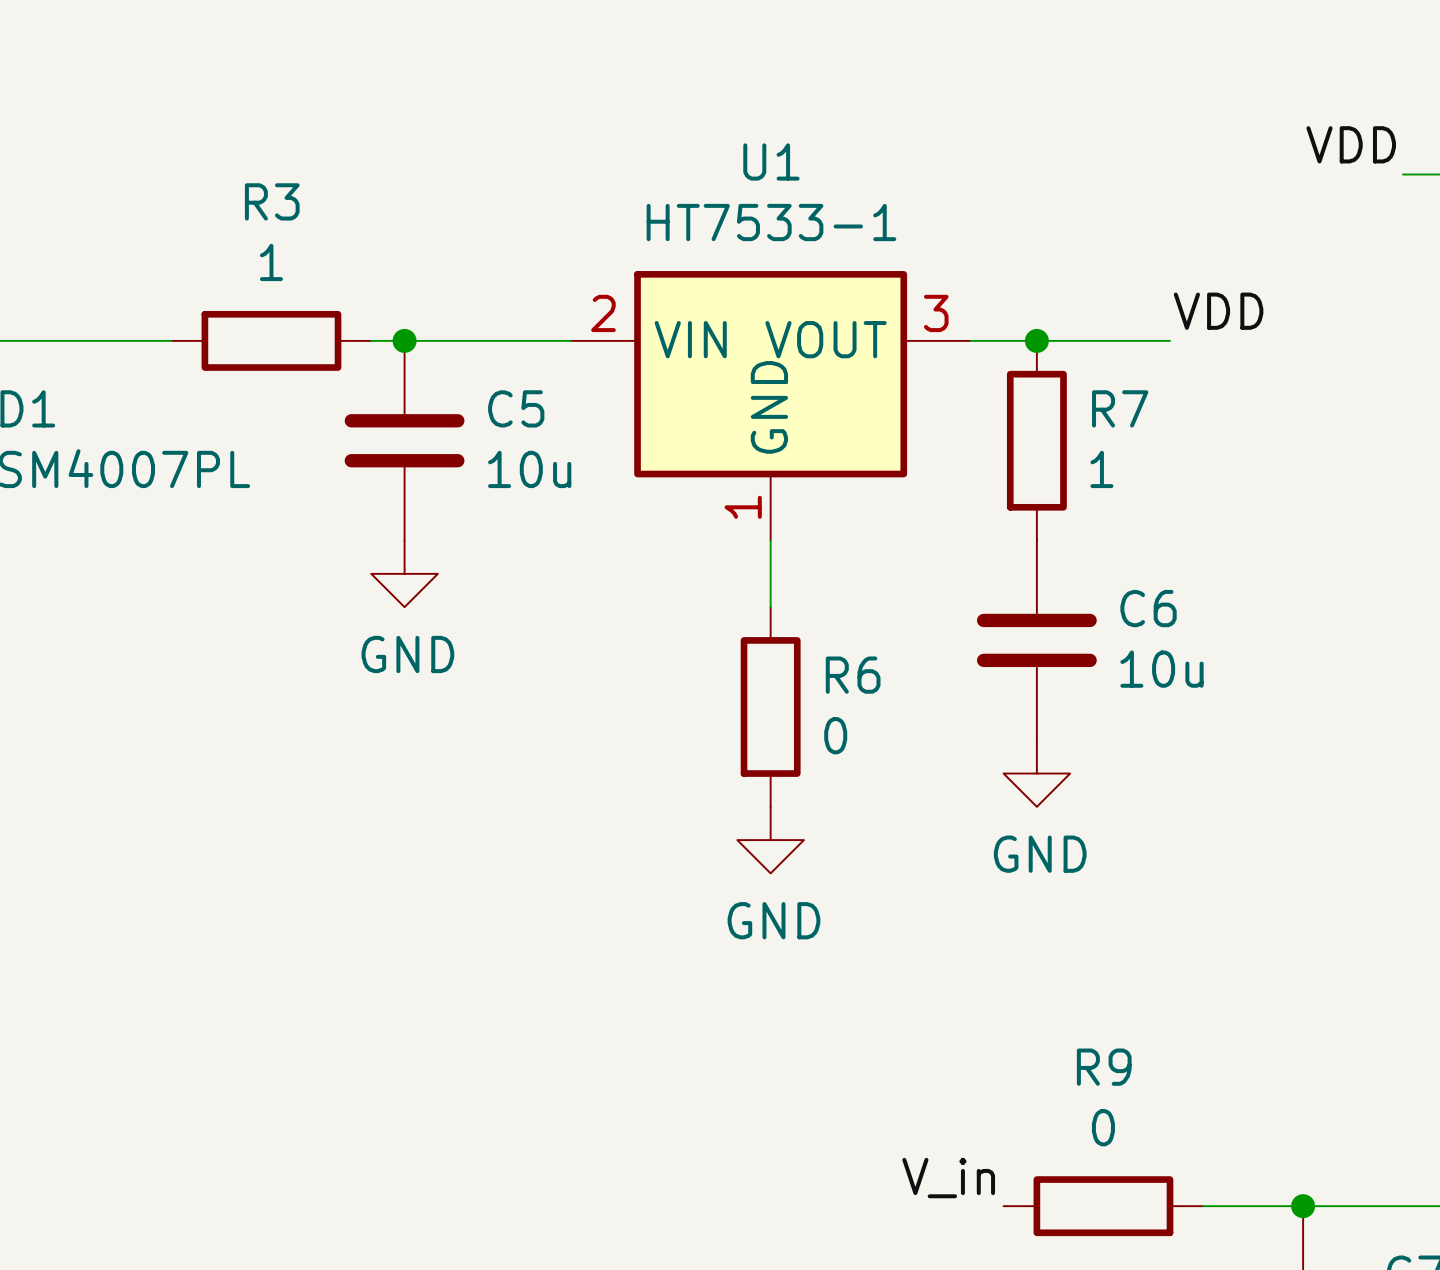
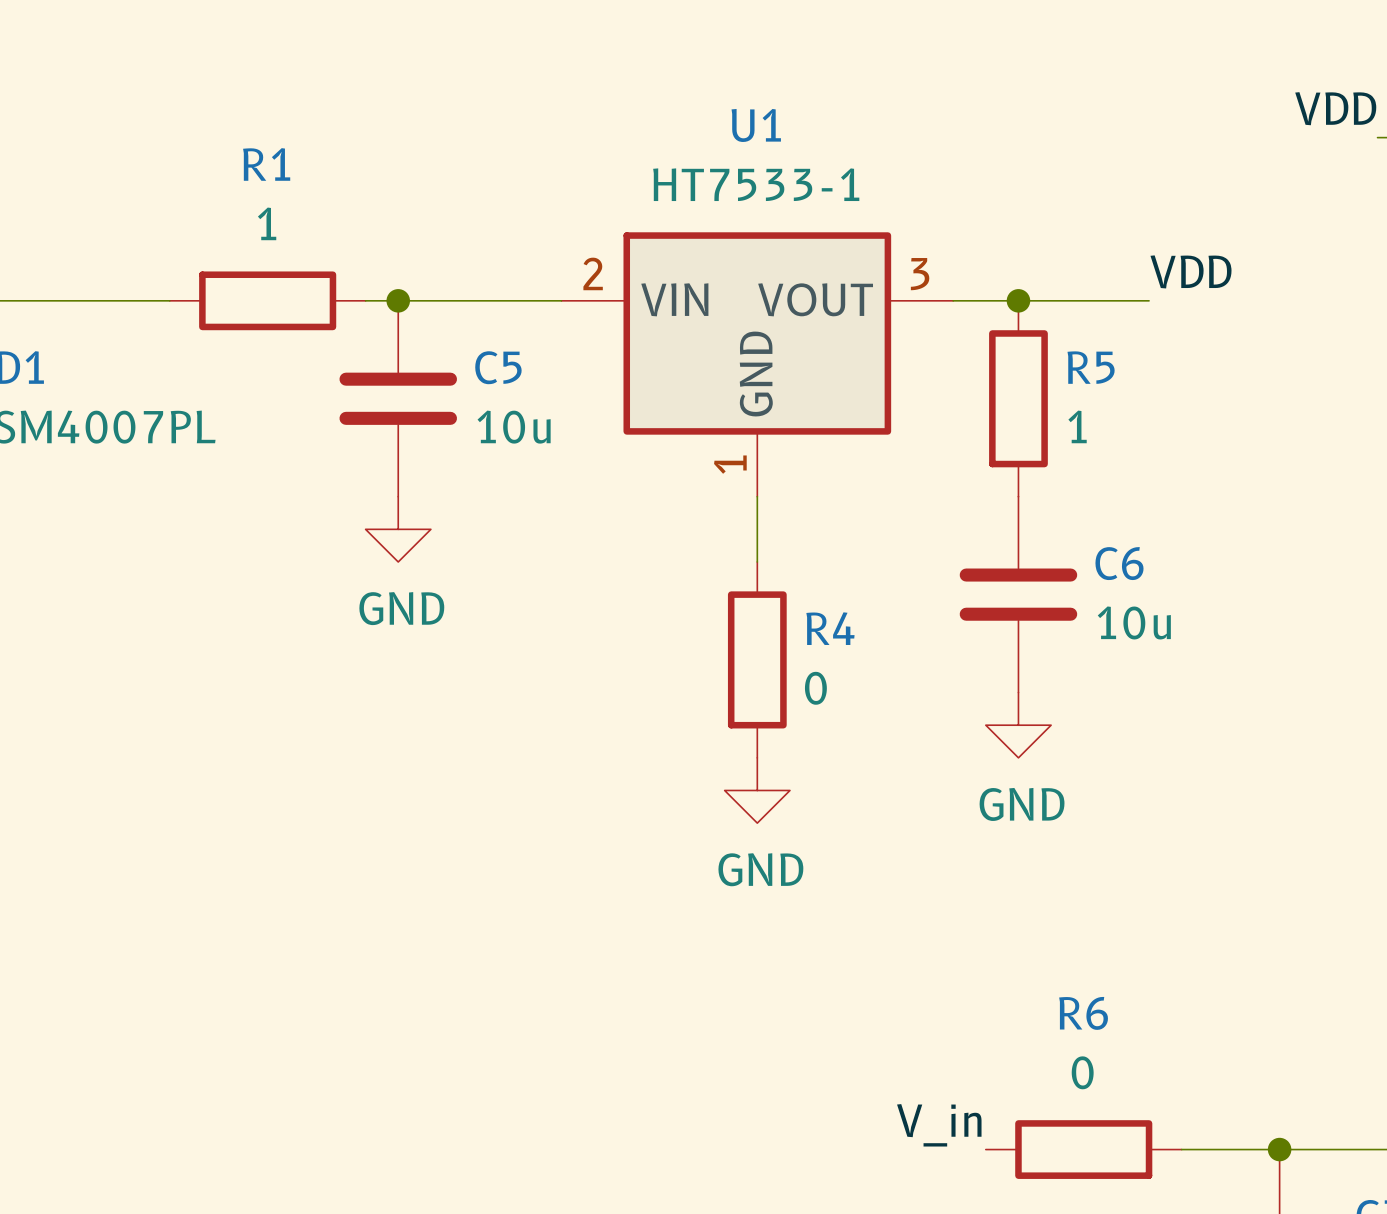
R3 name: R3 (272, 201) -> R1 (266, 164)
R7 name: R7 (1120, 408) -> R5 (1091, 367)
R6 name: R6 (853, 675) -> R4 (830, 628)
R9 name: R9 (1104, 1067) -> R6 (1083, 1013)

